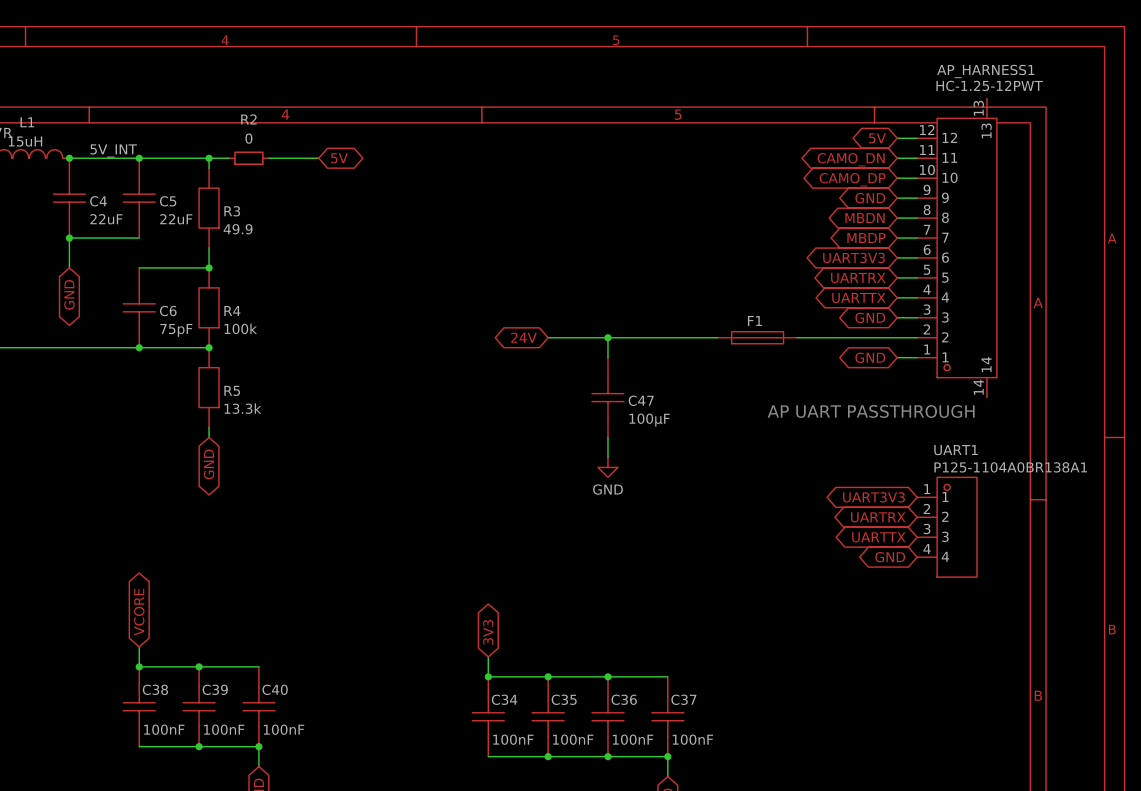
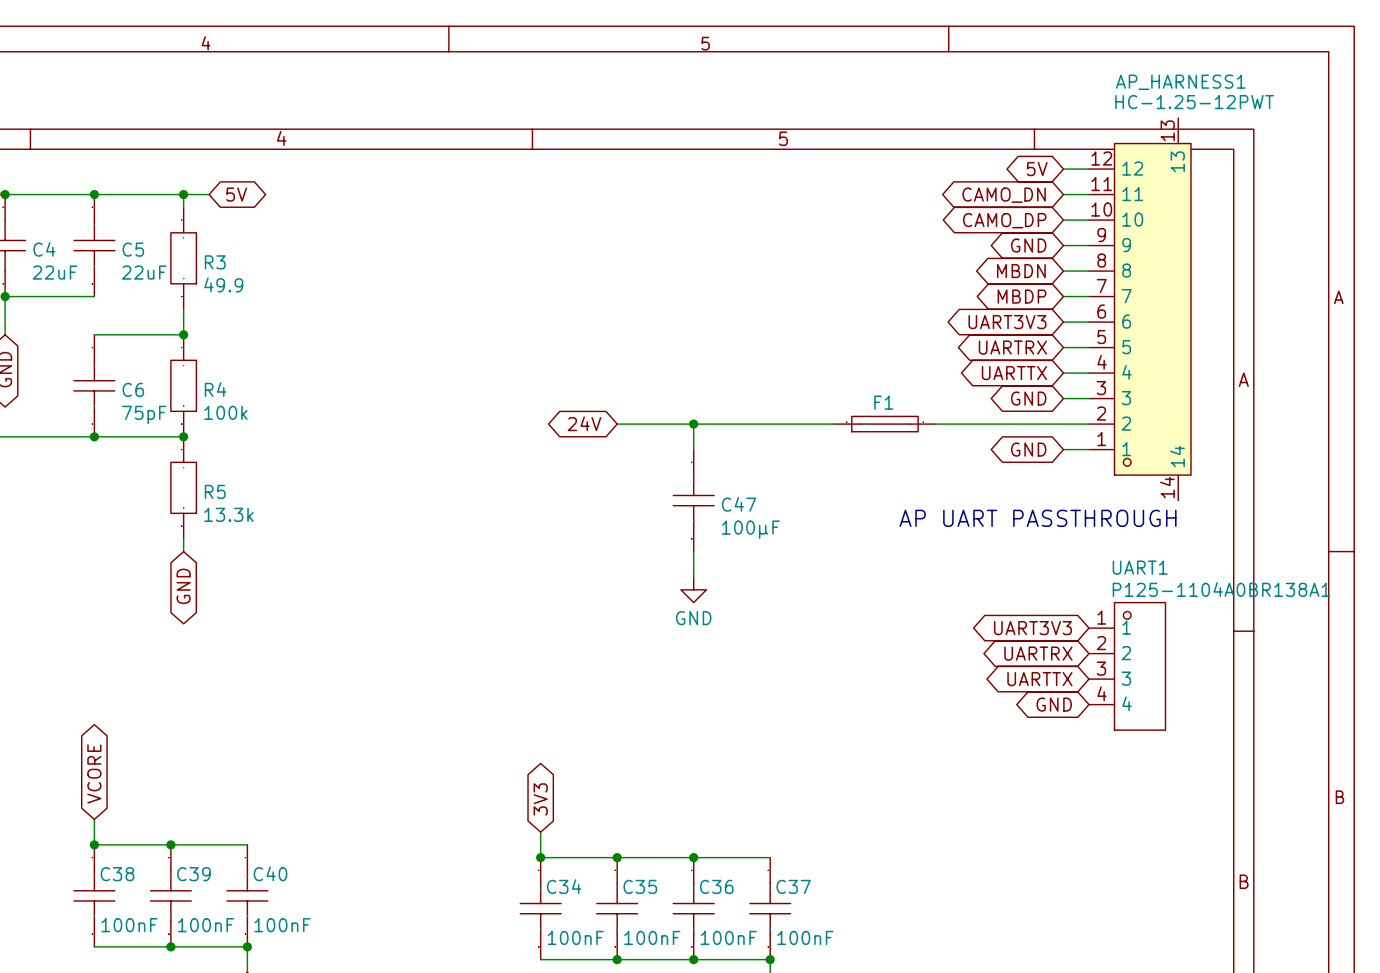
label: 5V_INT (113, 150) -> none
R2: 0 (248, 158) -> none
wire: (268, 158) (318, 158) -> none
global label position: 5V (339, 158) -> 5V (236, 194)

